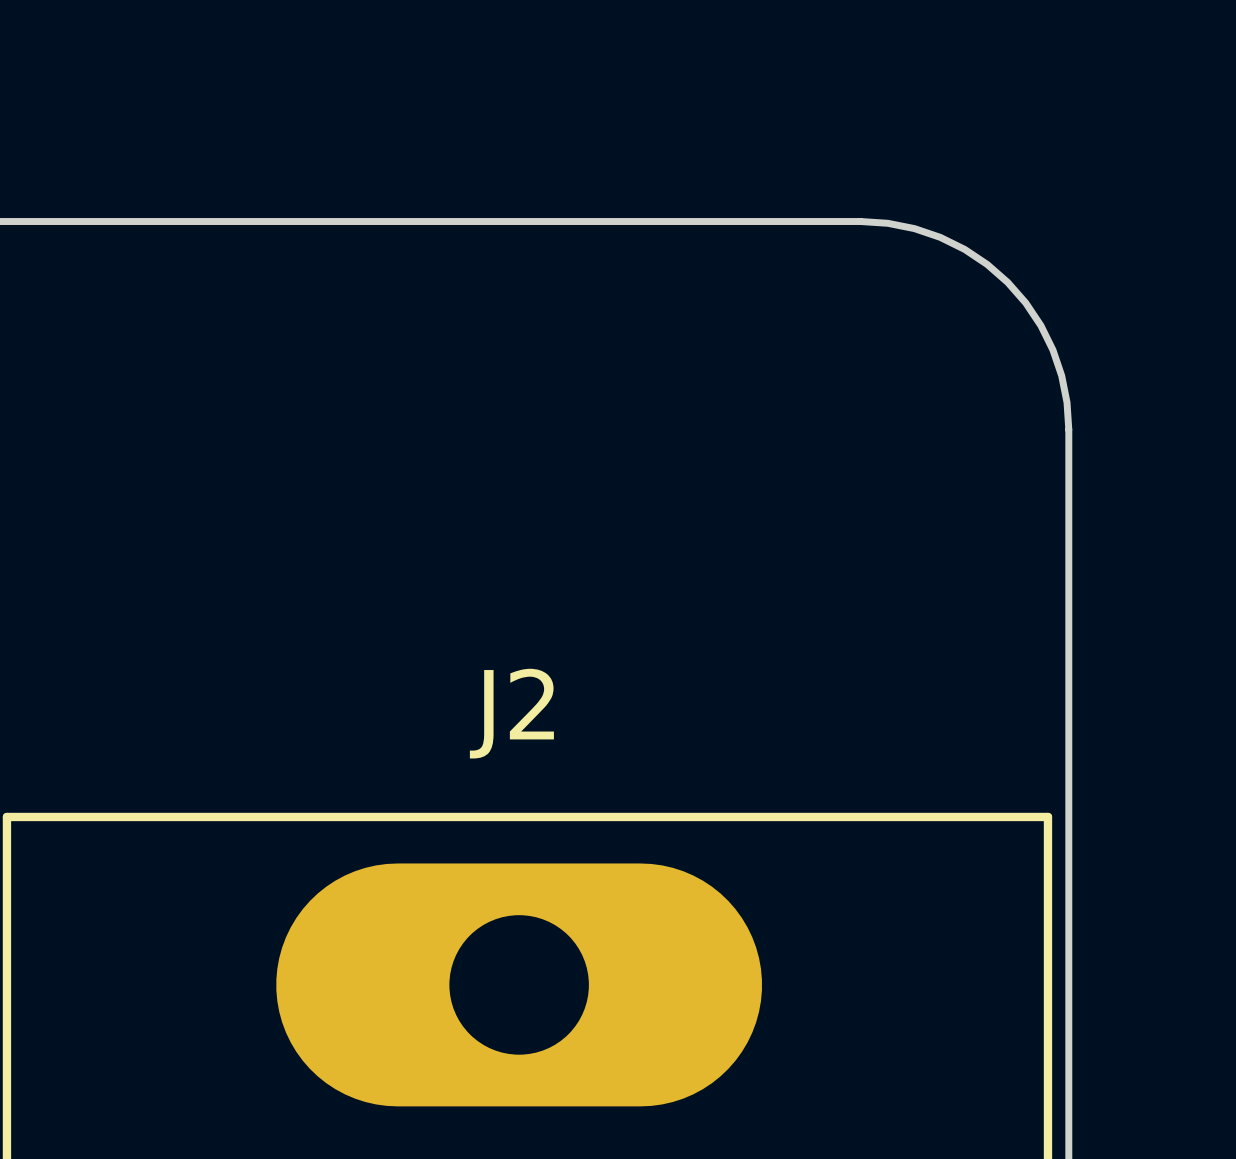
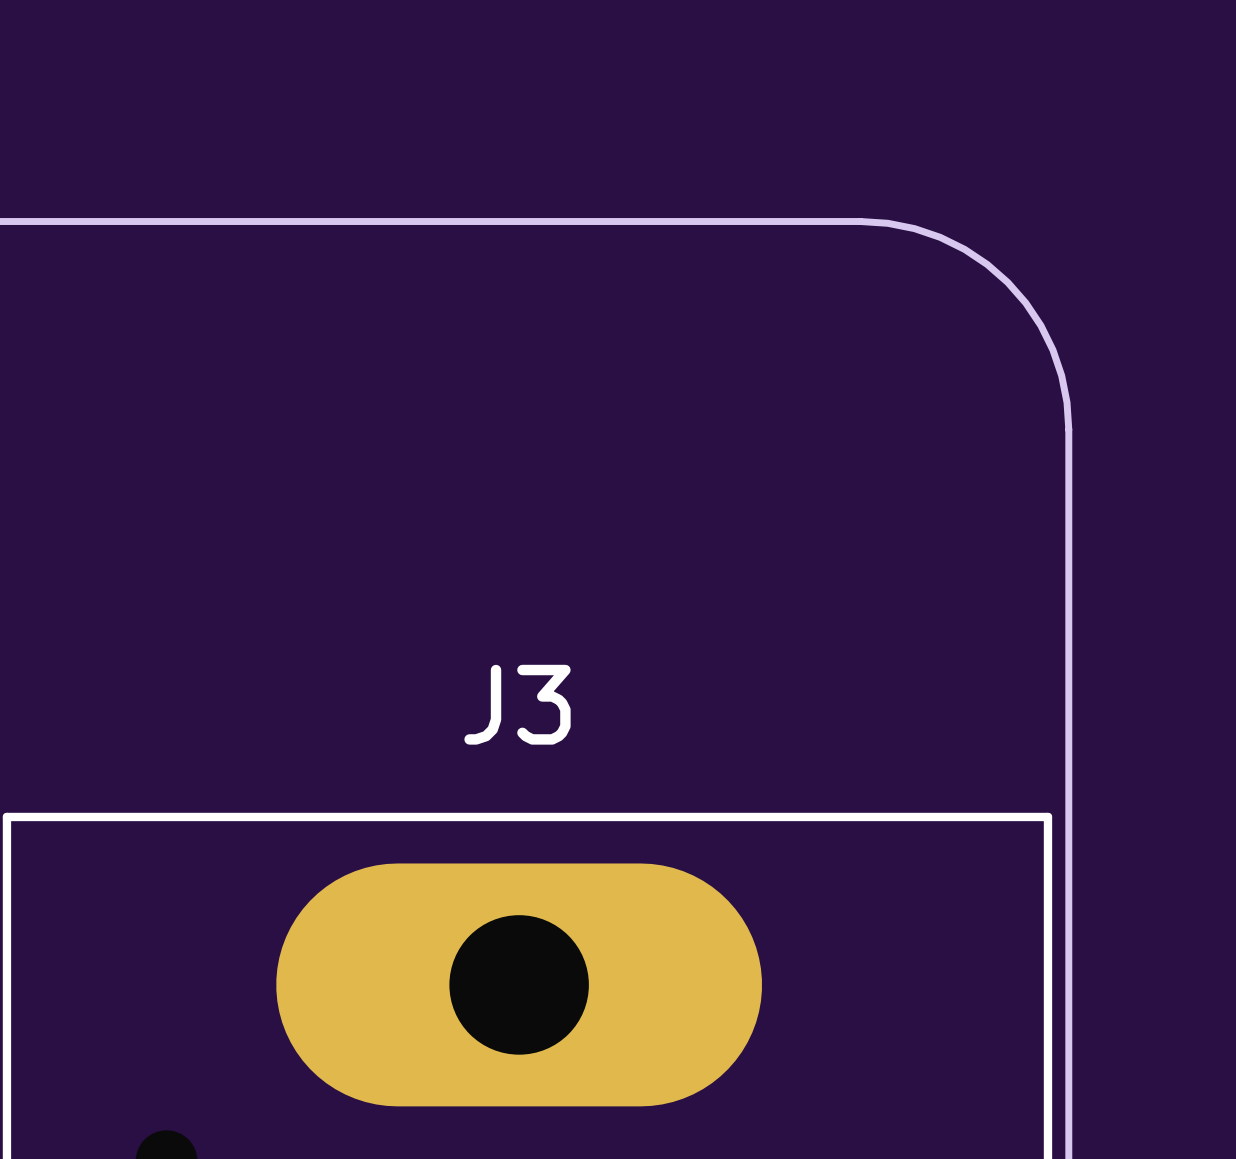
J2 name: J2 (511, 713) -> J3 (517, 704)

